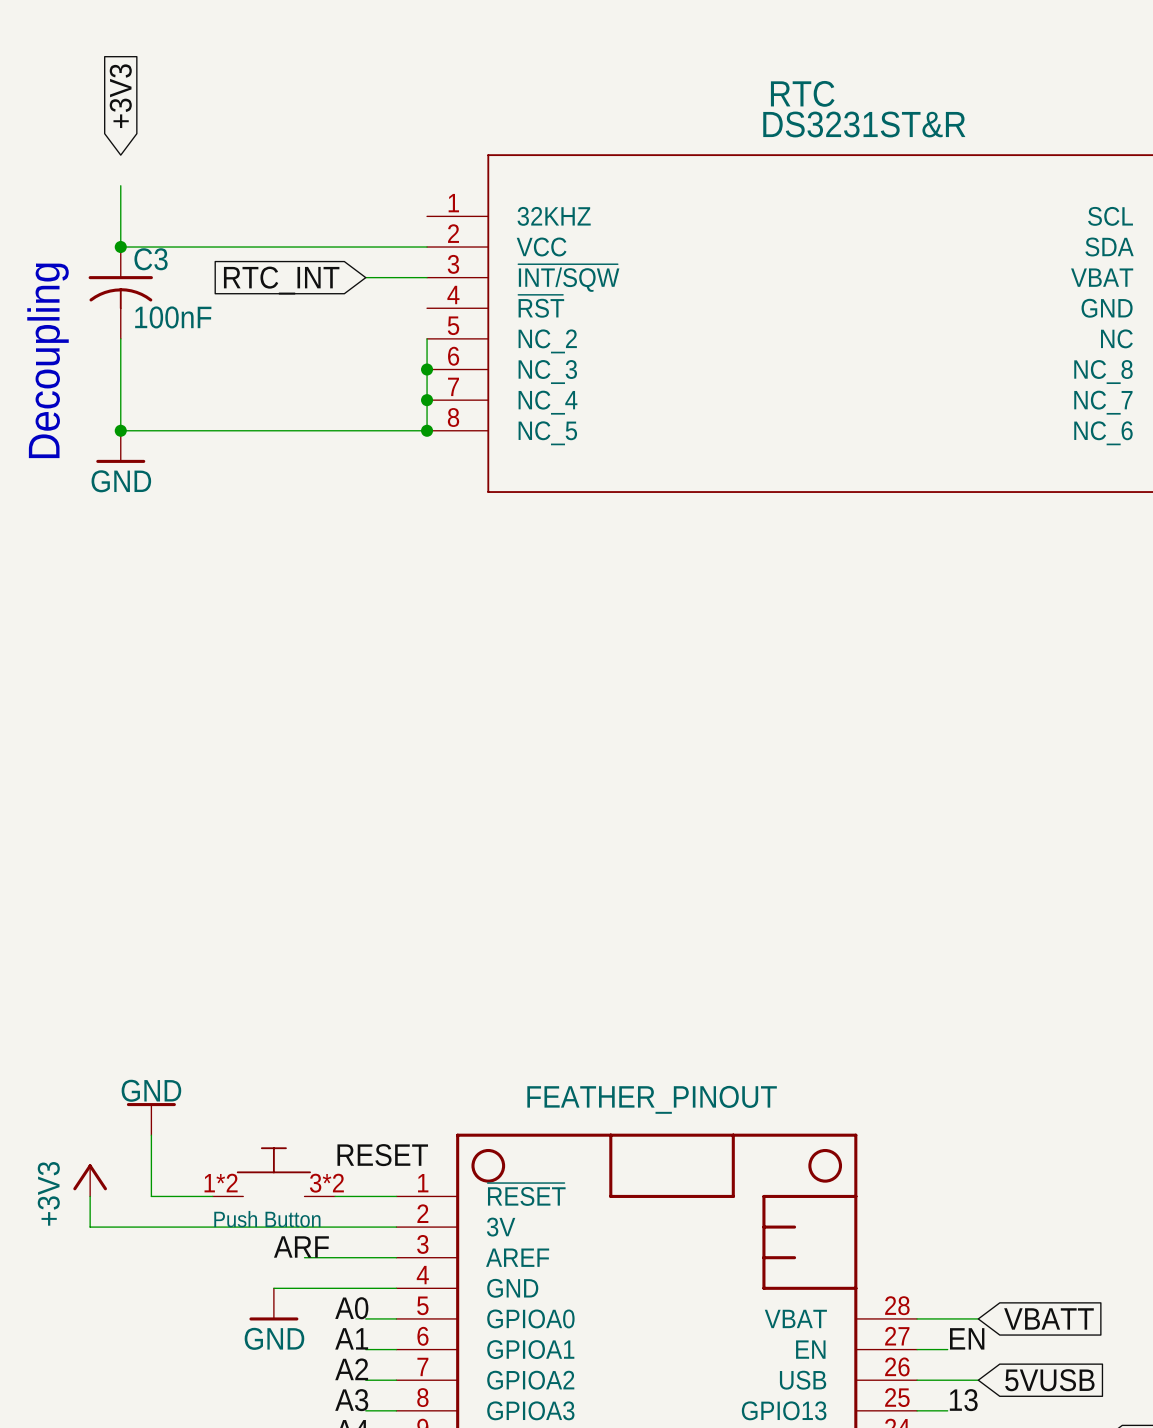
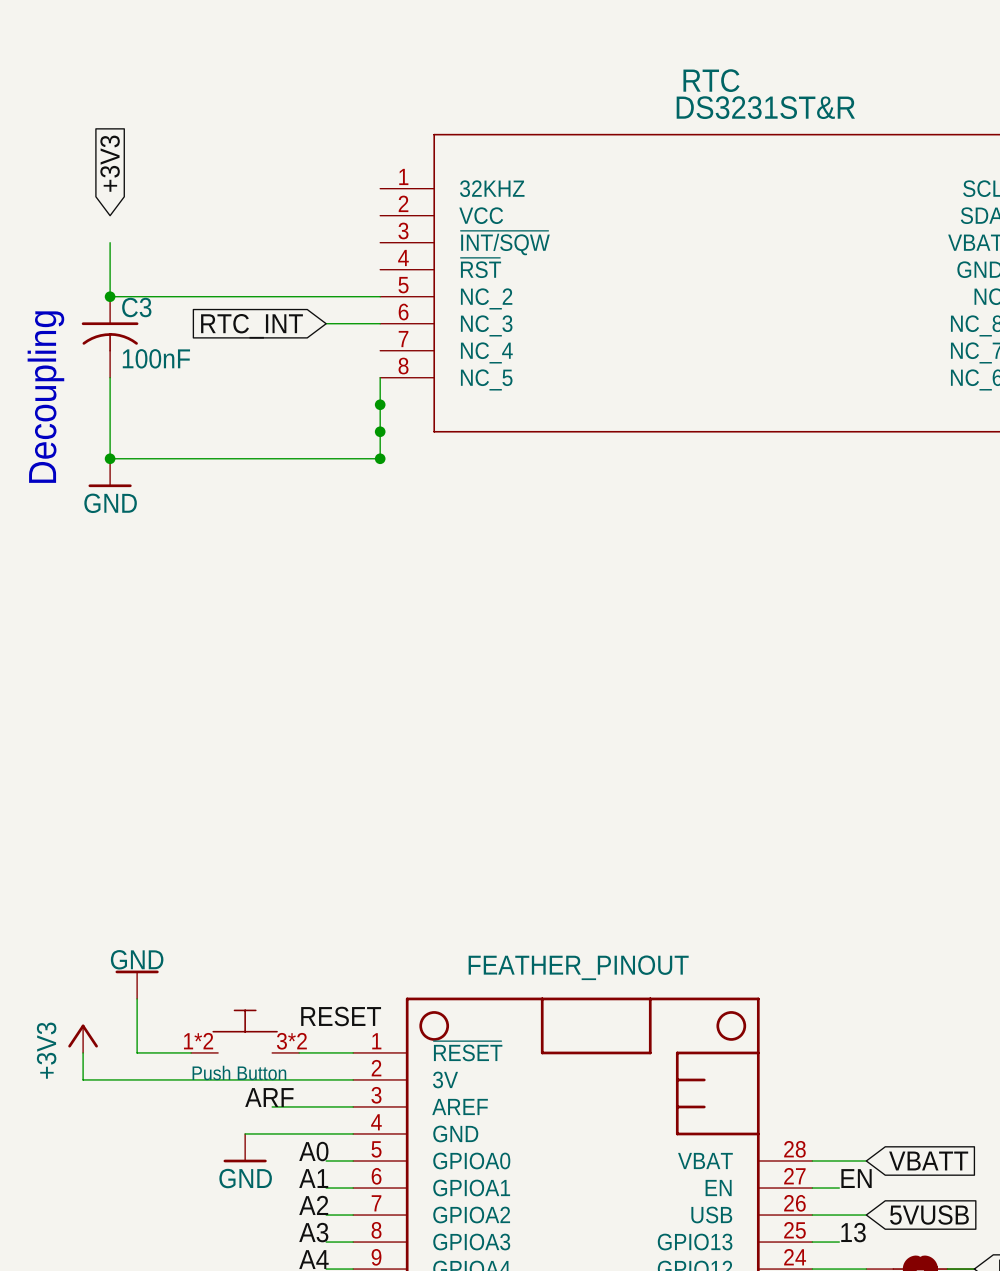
global label position: +3V3 (120, 96) -> +3V3 (110, 163)
wire: (120, 185) (120, 247) (427, 247) -> none
junction: (120, 247) -> none
wire: (365, 277) (427, 277) -> (326, 323) (380, 323)
global label position: RTC_INT (281, 280) -> RTC_INT (251, 326)
C3 position: (120, 292) -> (110, 337)
wire: (120, 338) (120, 430) (427, 430) (427, 338) -> (110, 242) (110, 296) (380, 296)
junction: none -> (110, 296)
text position: Decoupling (48, 360) -> Decoupling (45, 397)
junction: (427, 369) -> none
junction: (427, 400) -> none
wire: none -> (110, 377) (110, 458) (380, 458) (380, 377)
junction: (120, 430) -> none
junction: (427, 430) -> none
power symbol position: GND (120, 446) -> GND (110, 472)
junction: none -> (380, 404)
junction: none -> (380, 431)
junction: none -> (110, 458)
junction: none -> (380, 458)

